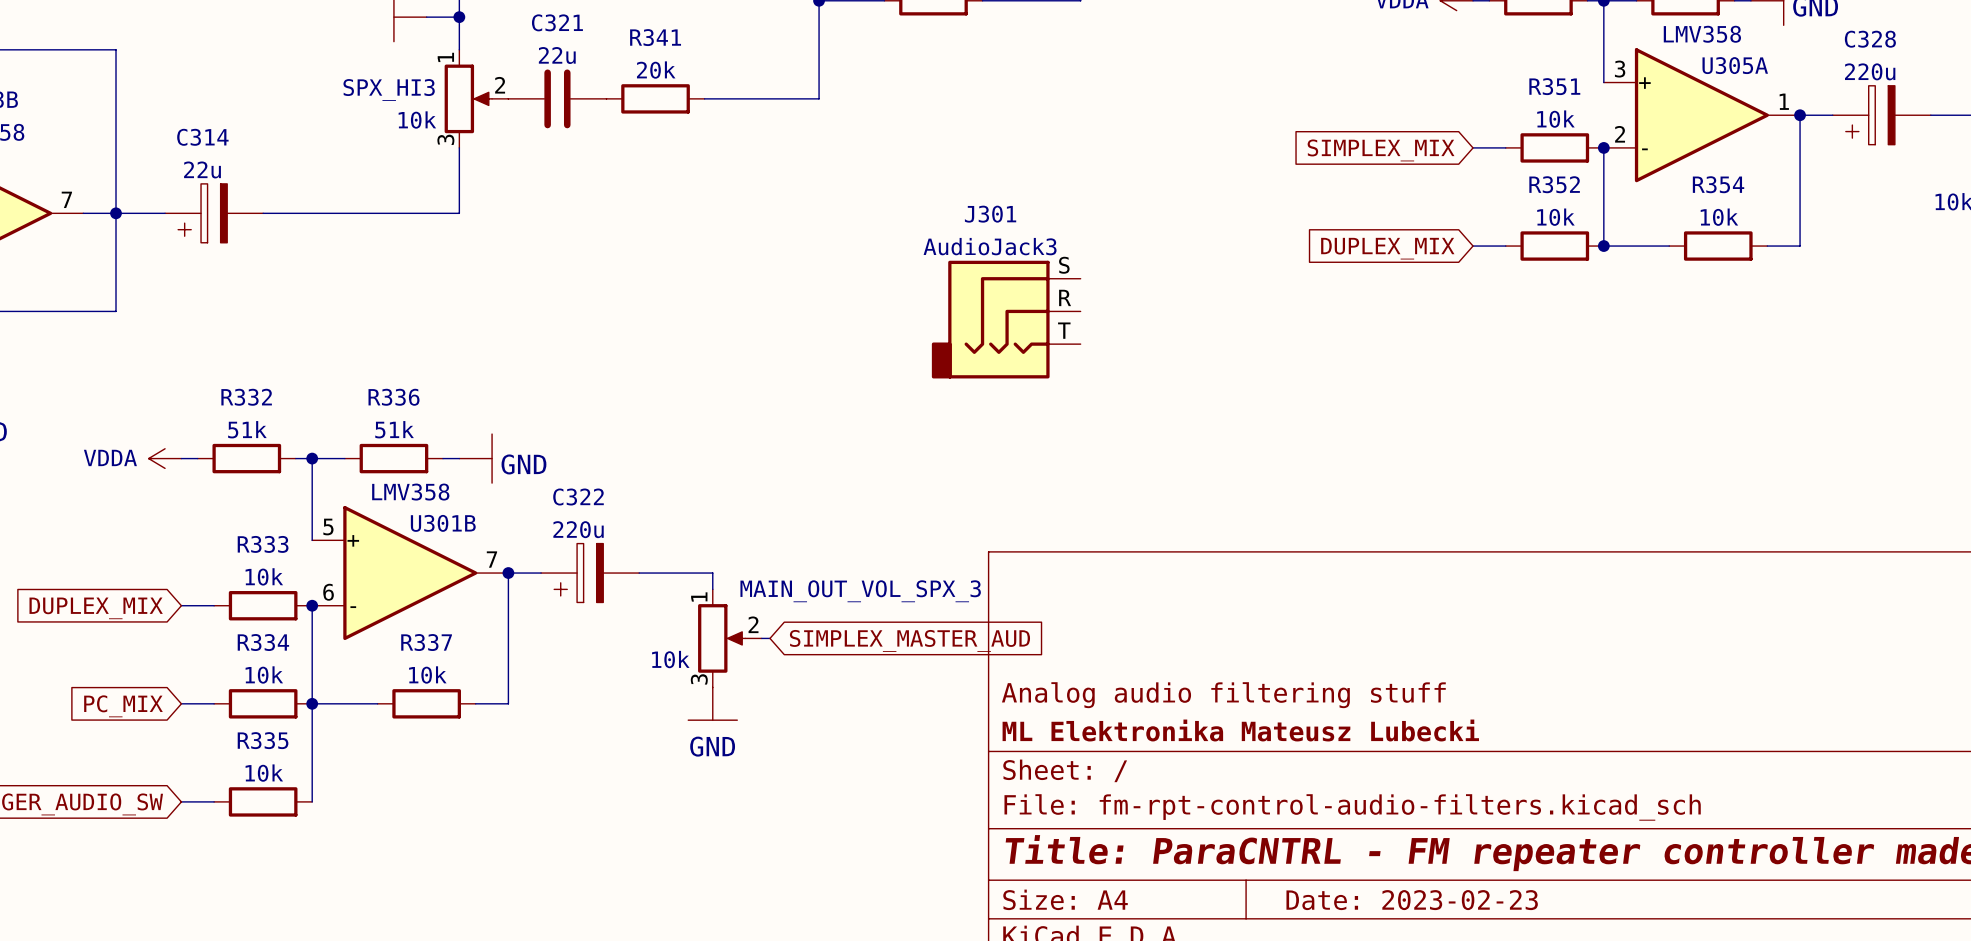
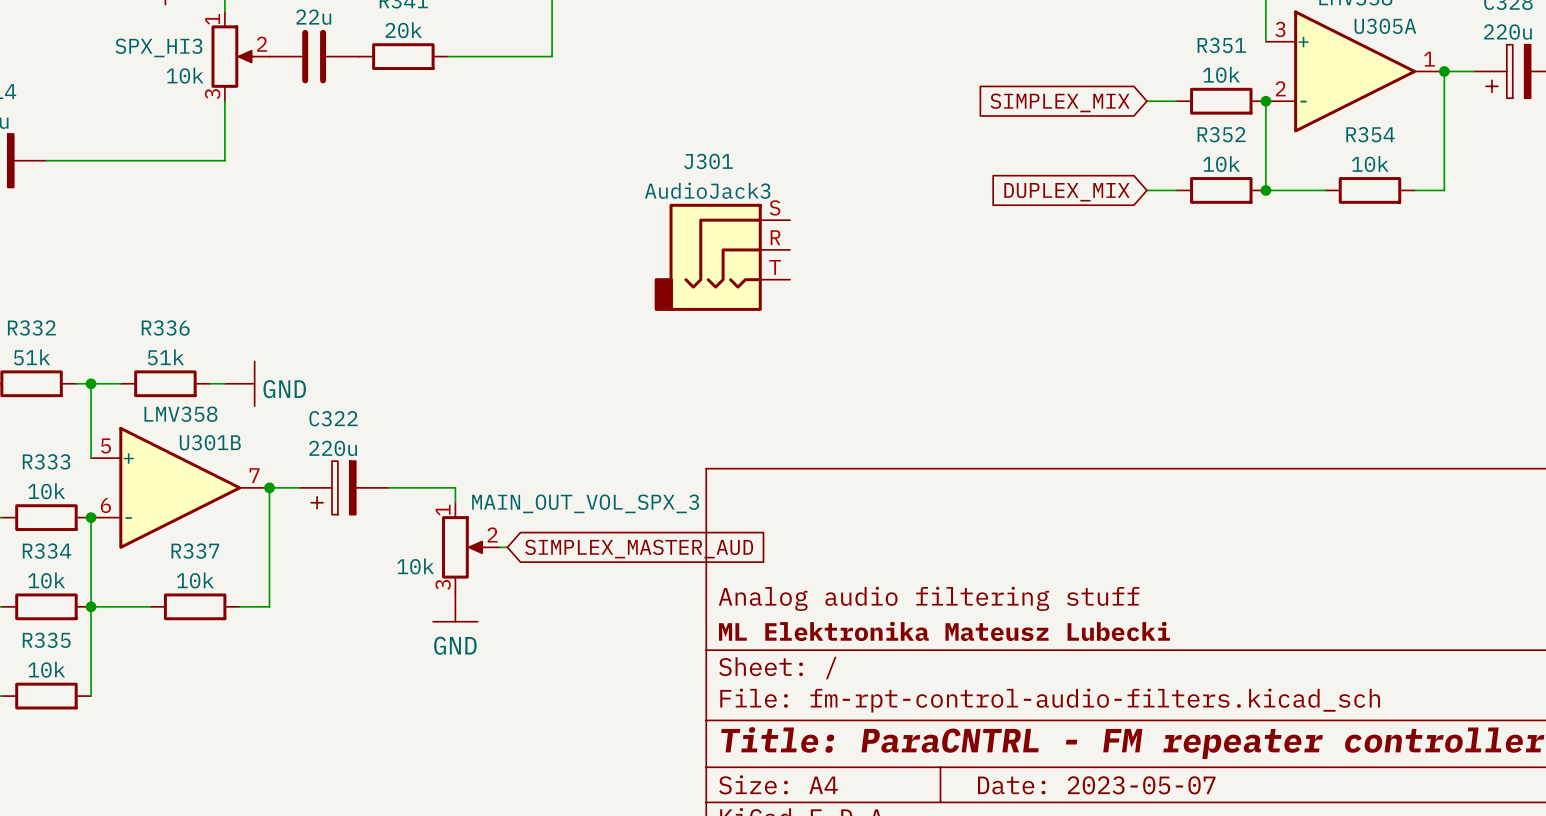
title block: Date: 2023-02-23 (1412, 900) -> Date: 2023-05-07 (1096, 785)

